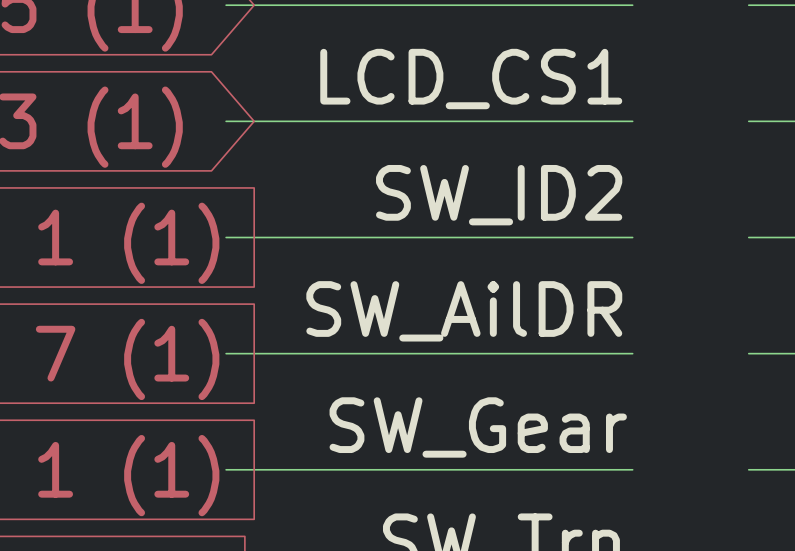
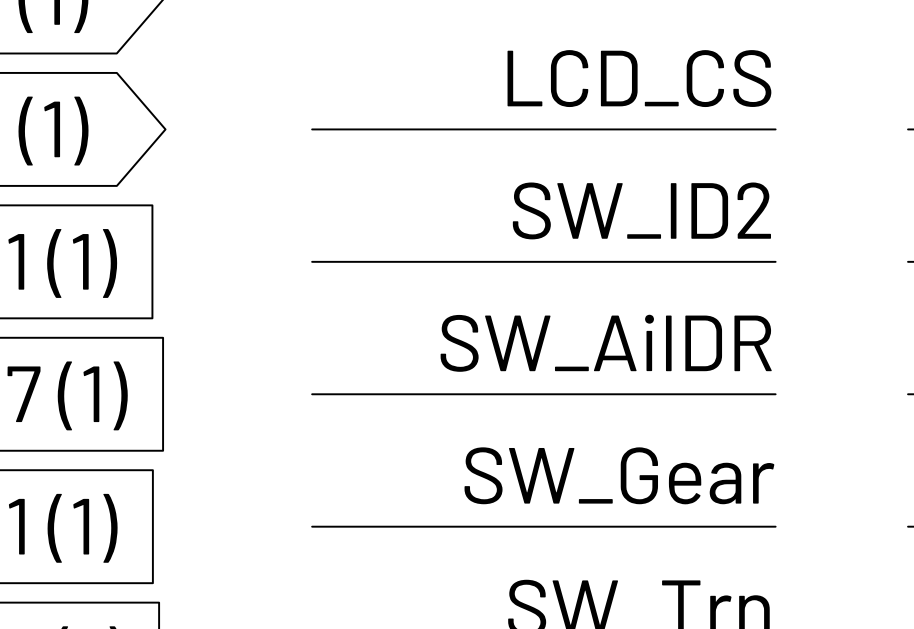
label: LCD_CS1 (471, 79) -> LCD_CS (639, 78)

